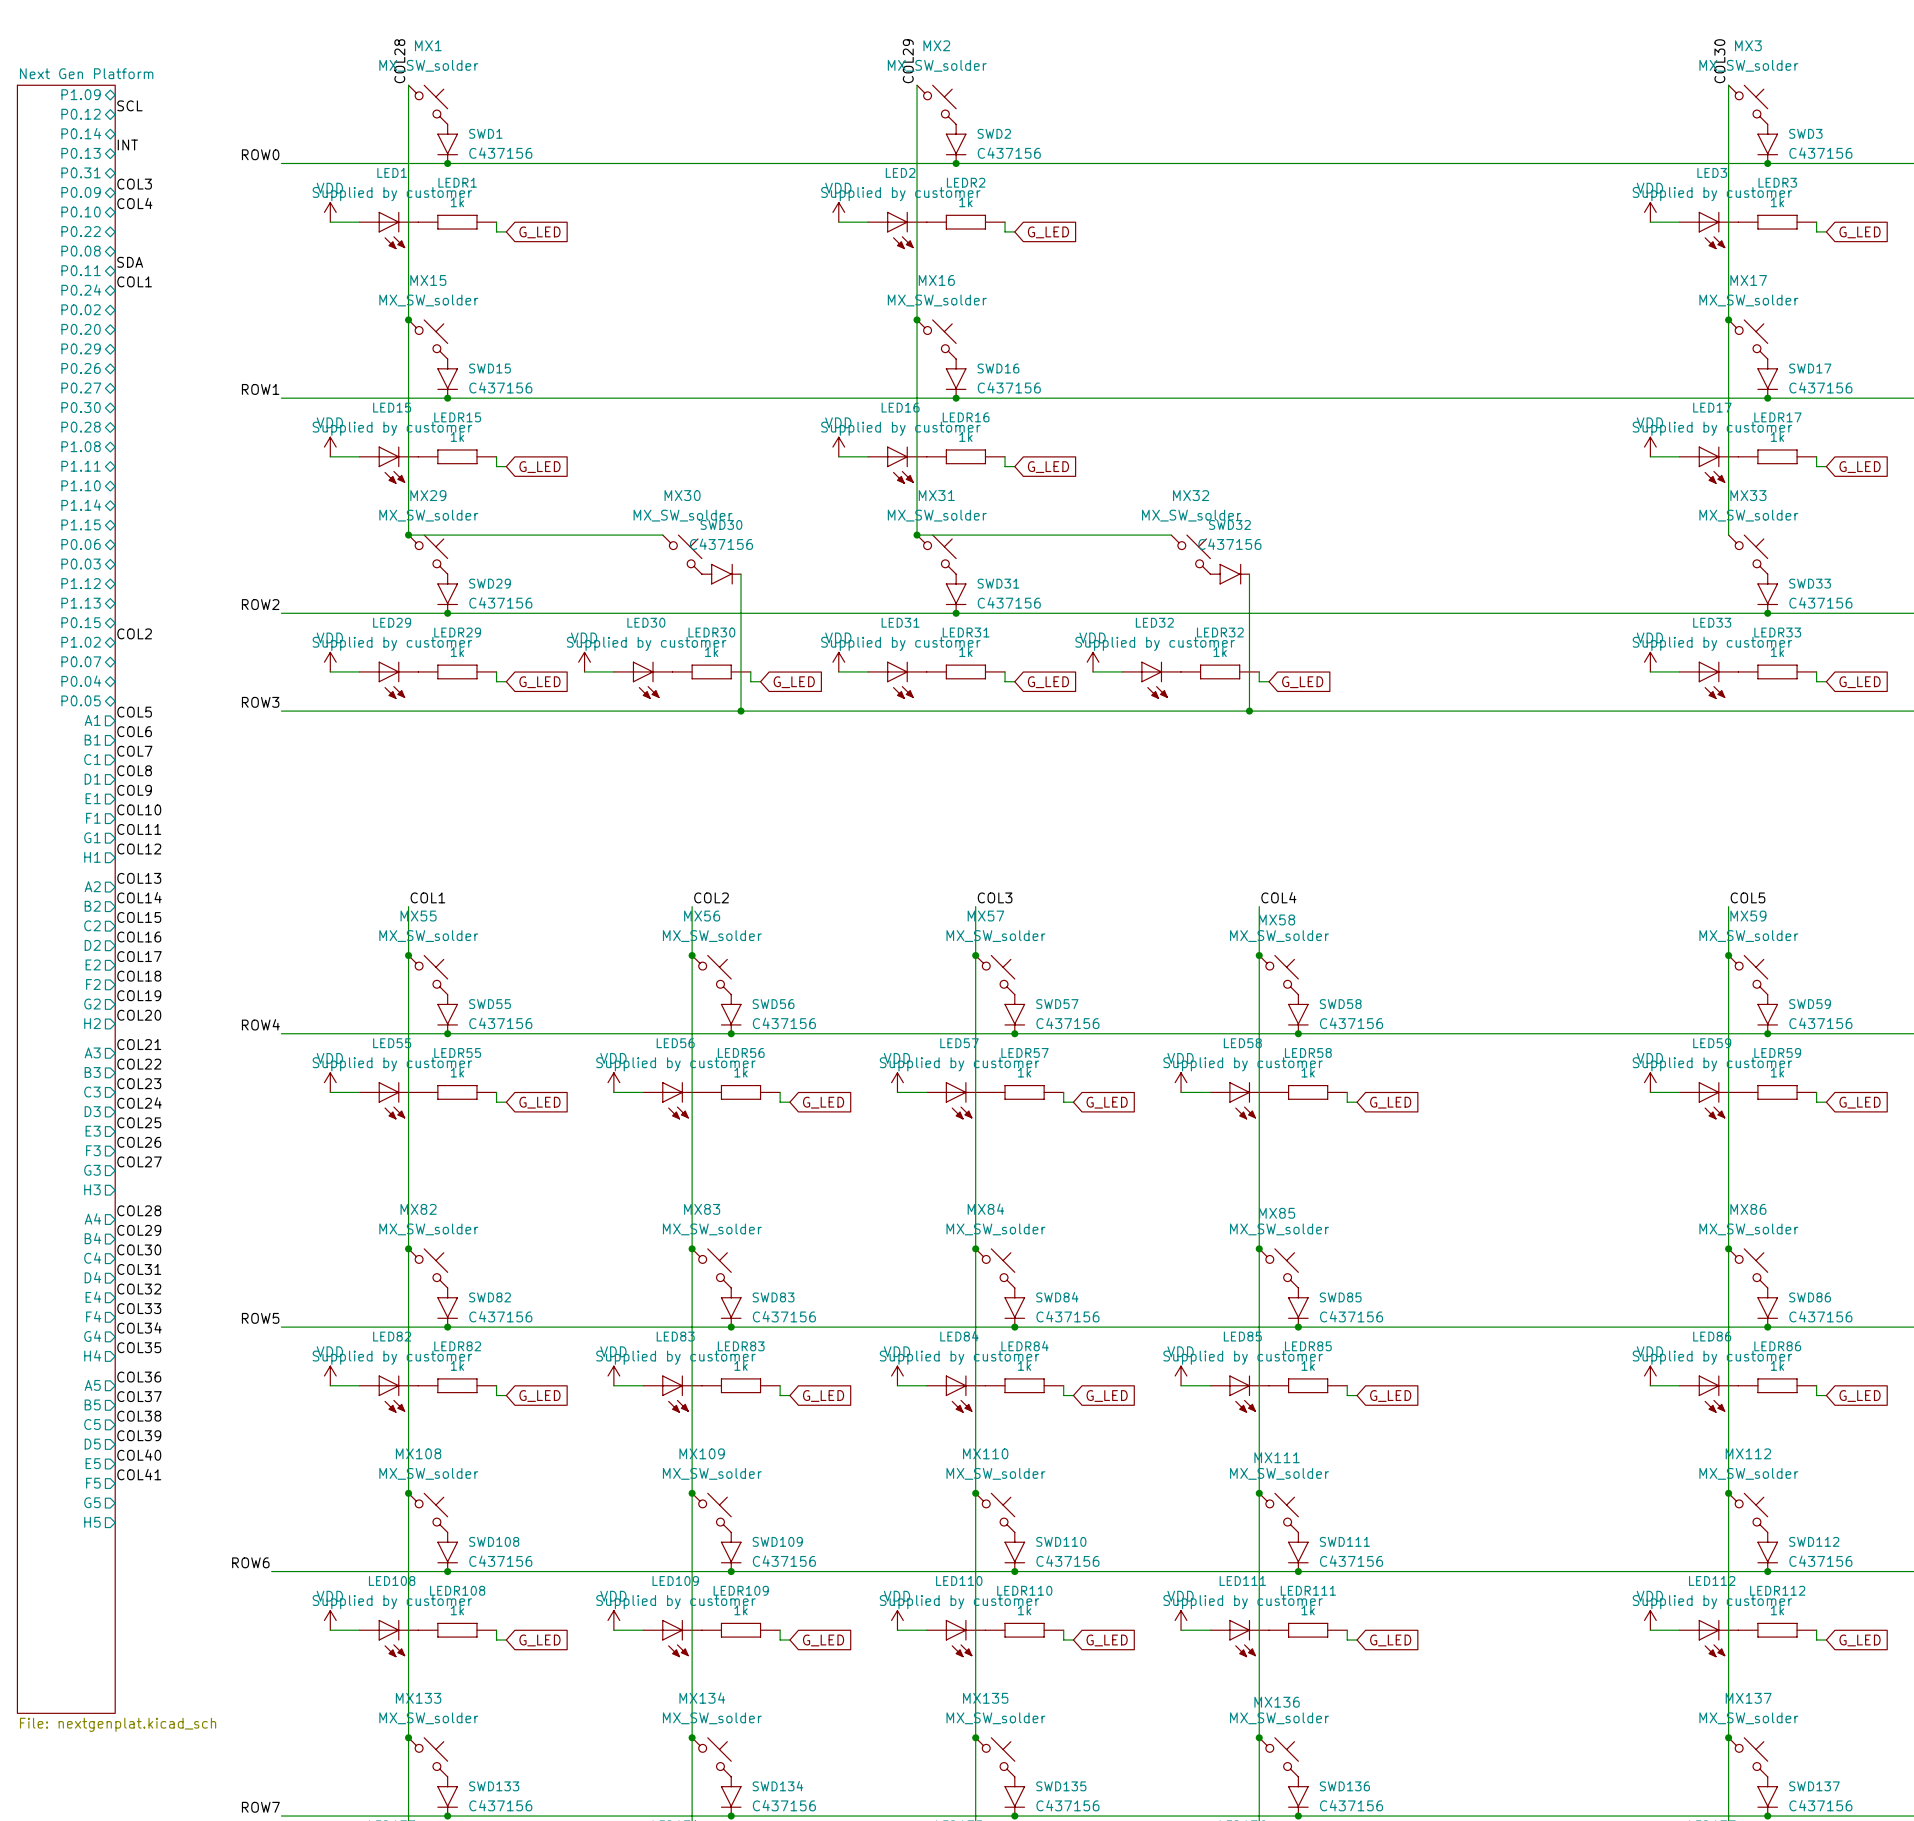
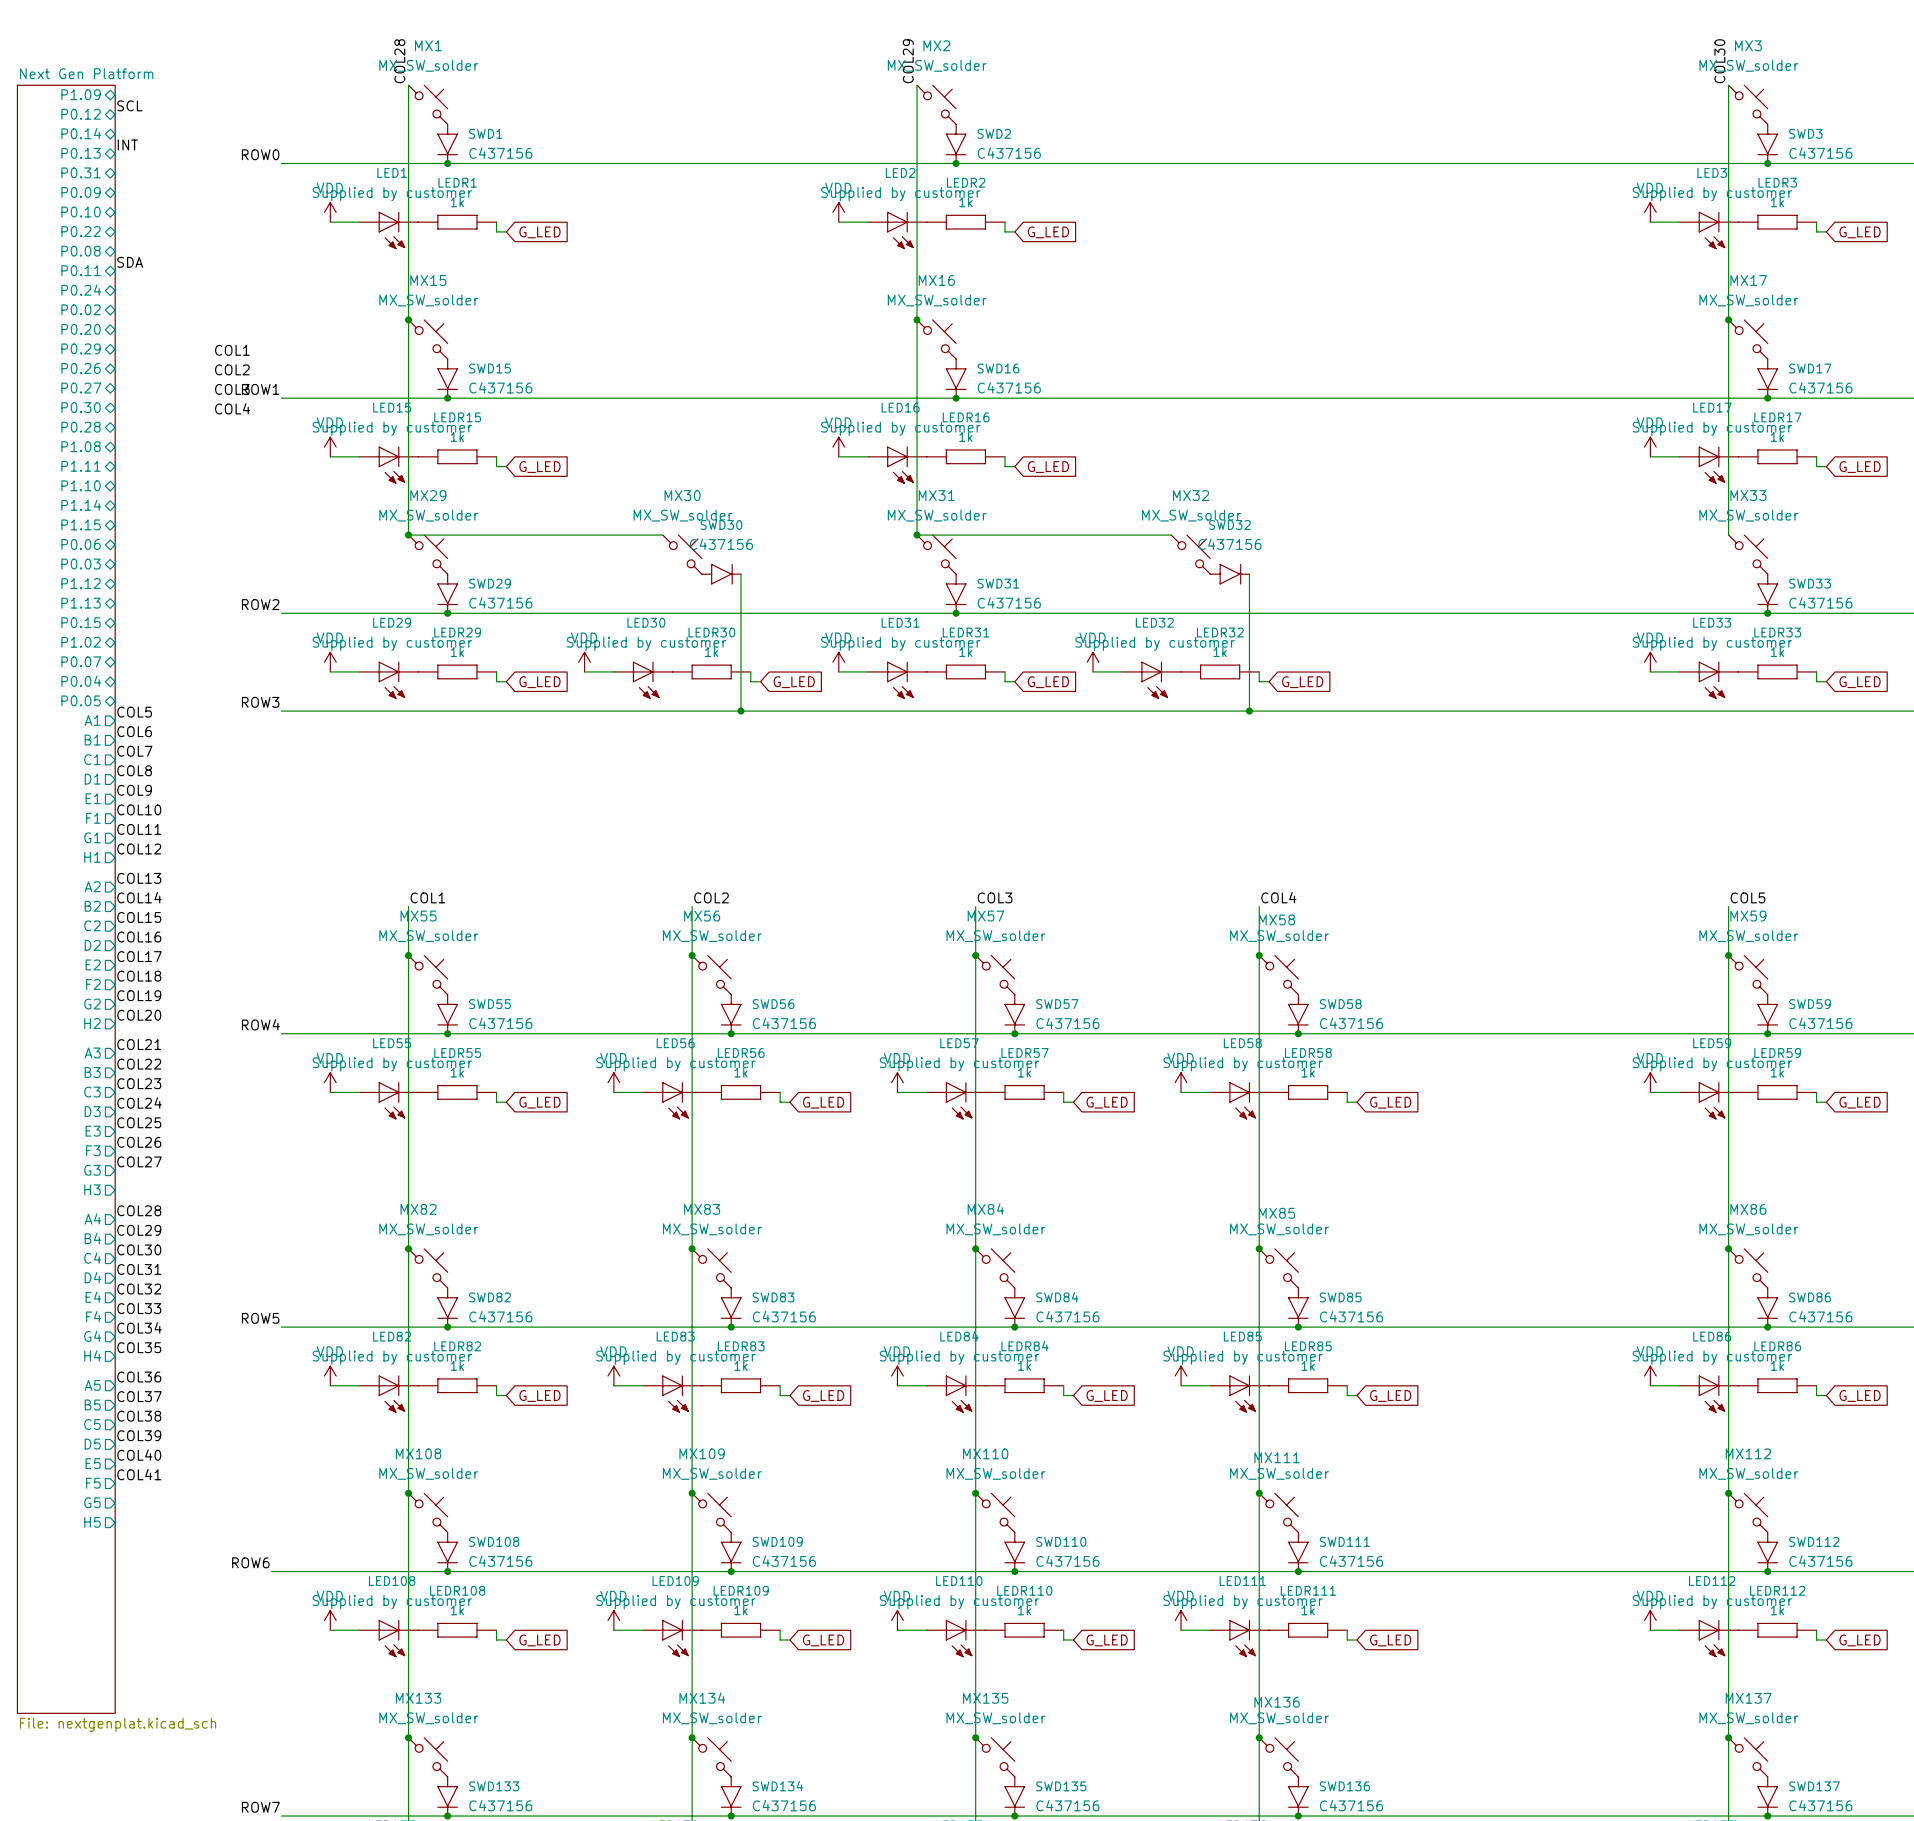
label: COL3 (134, 184) -> none
label: COL4 (134, 203) -> none
label position: COL1 (134, 281) -> COL1 (232, 350)
label: none -> COL2 (232, 369)
label: none -> COL3 (232, 389)
label: none -> COL4 (232, 408)
label: COL2 (134, 633) -> none

